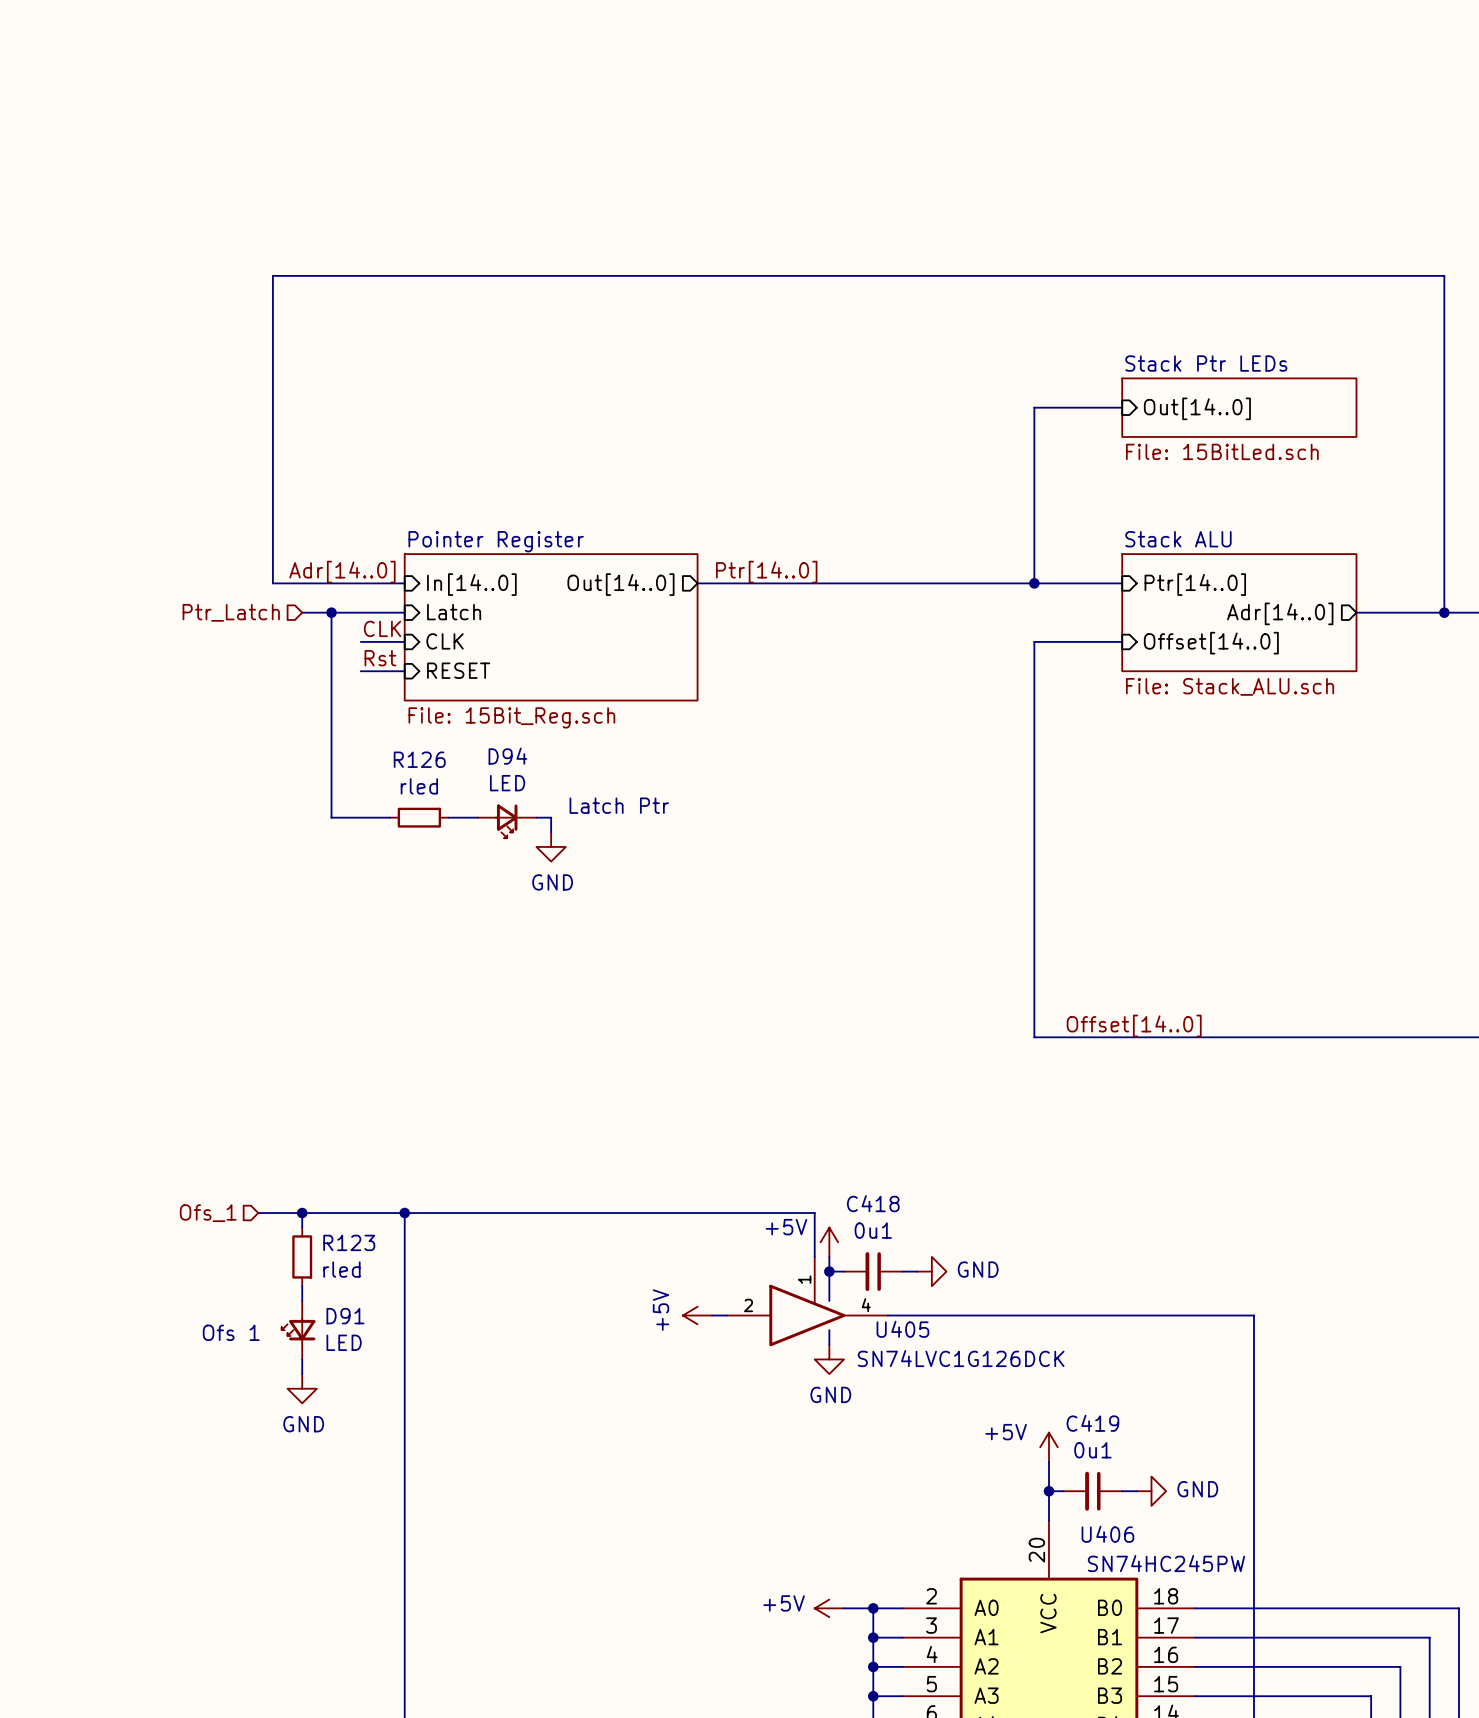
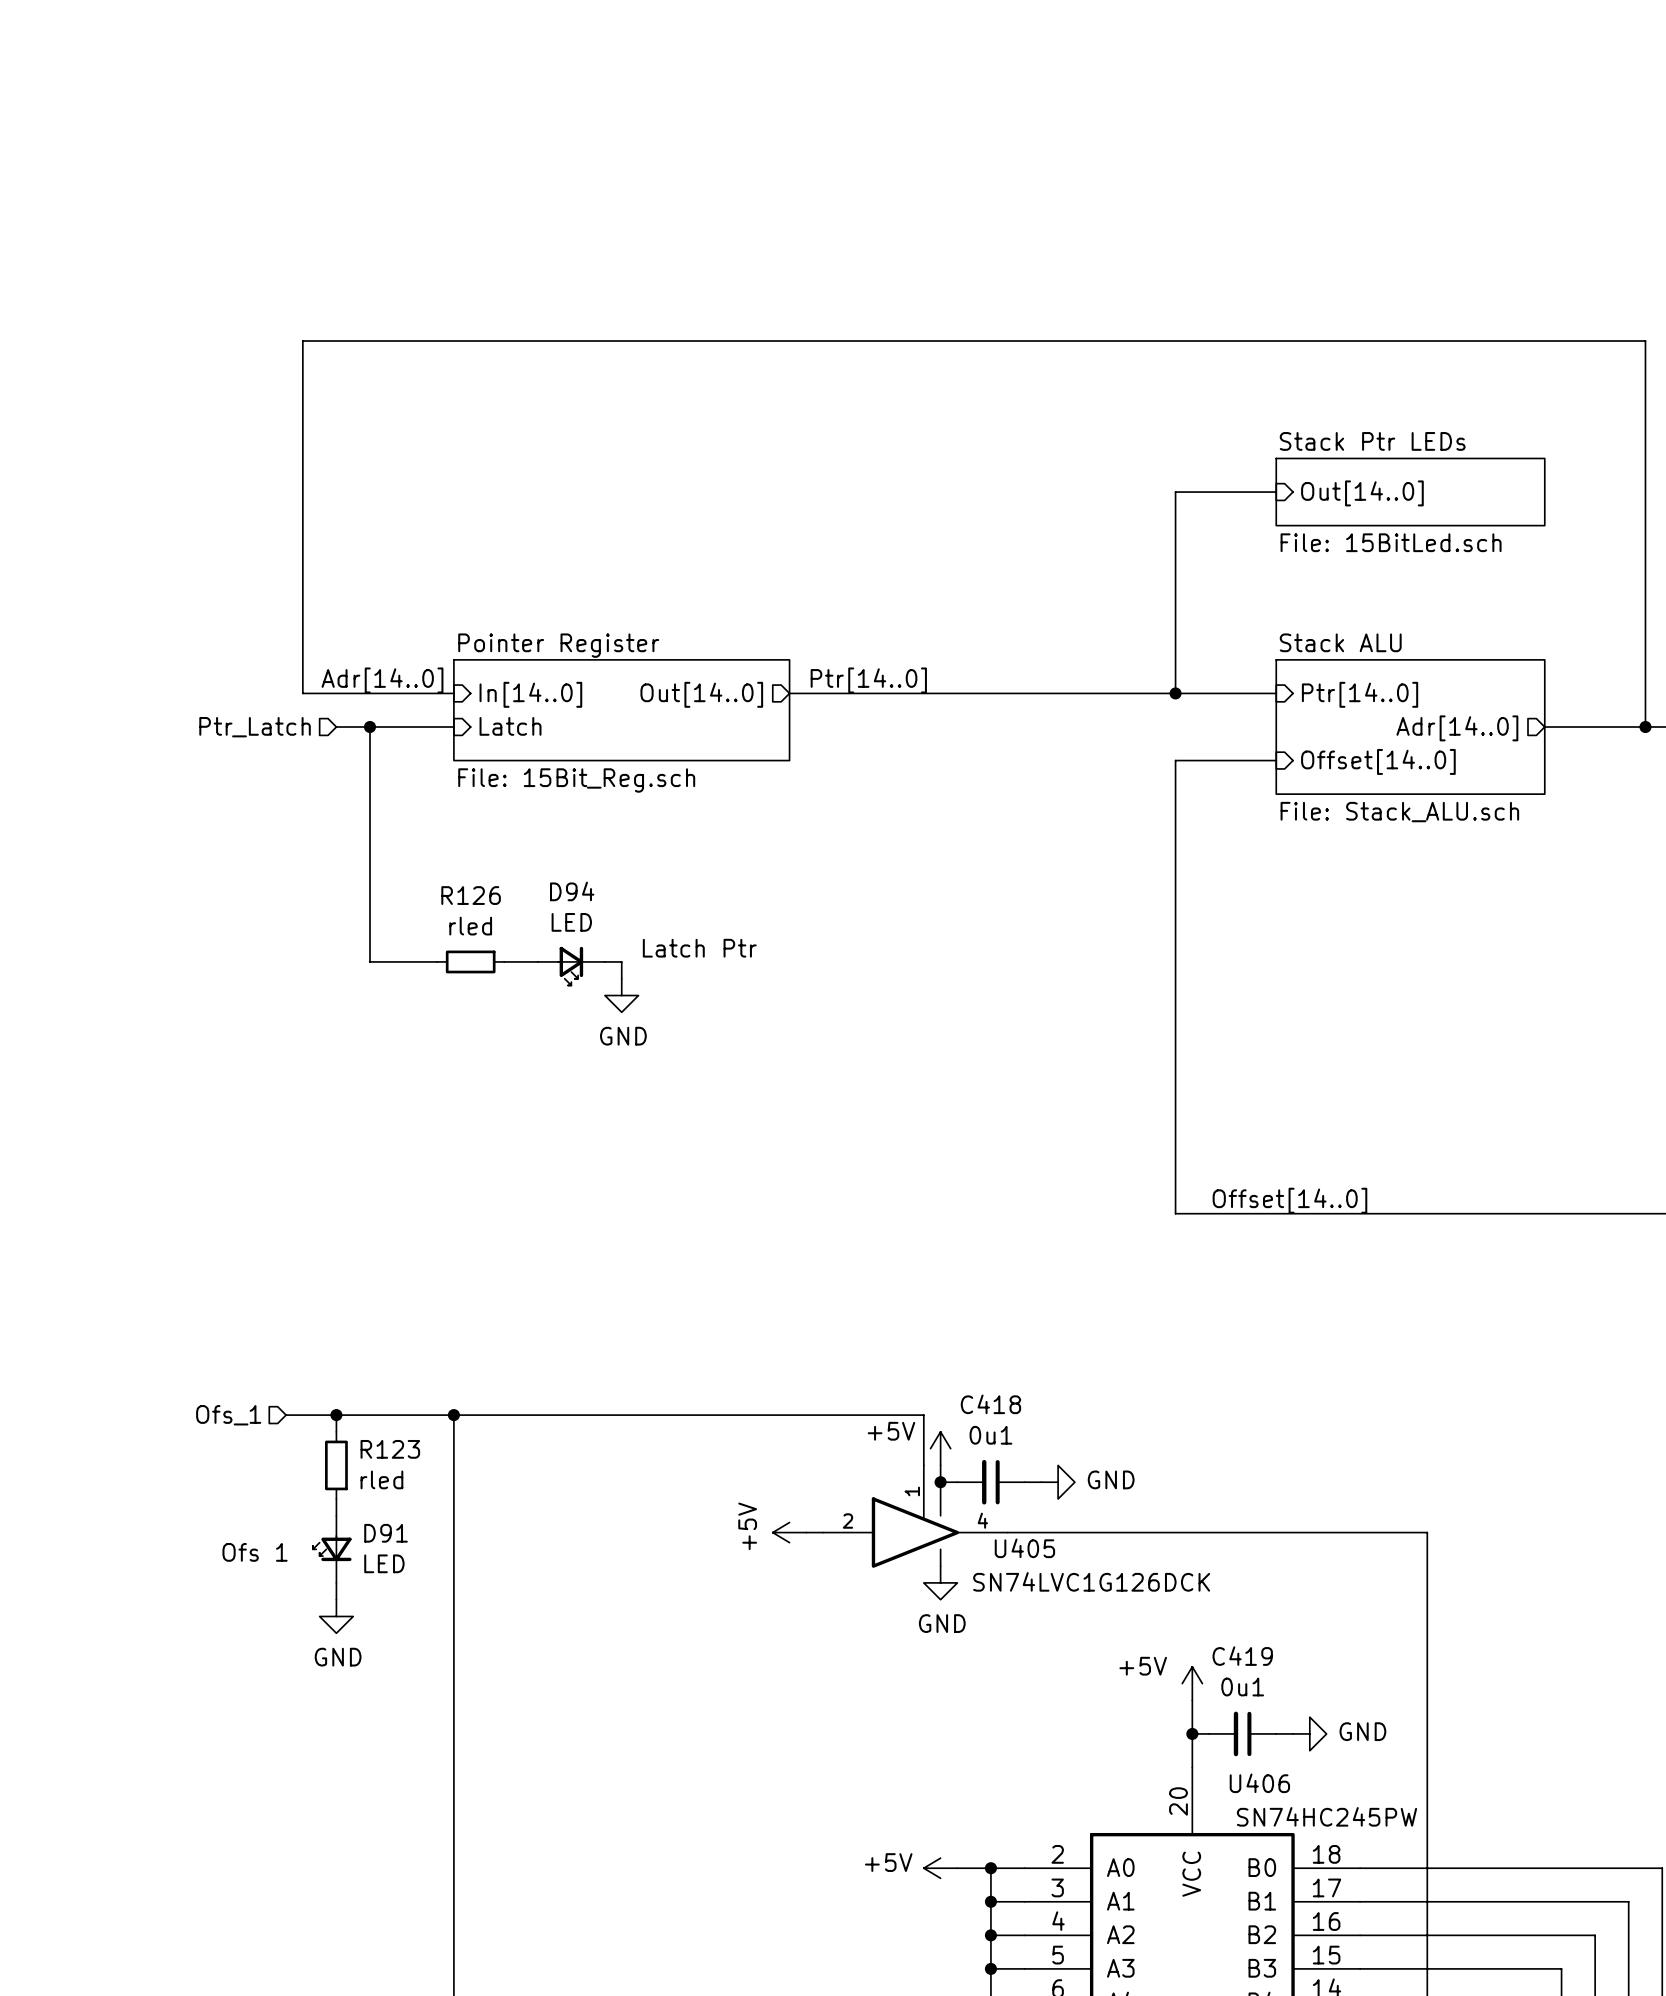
sheet Pointer Register: none -> File: 15Bit_Reg.sch (621, 710)
sheet Pointer Register: File: 15Bit_Reg.sch (551, 627) -> none
label: CLK (382, 628) -> none
wire: (360, 641) (404, 641) -> none
sheet pin: CLK (445, 641) -> none
label: Rst (380, 658) -> none
sheet pin: RESET (458, 670) -> none
wire: (360, 671) (404, 671) -> none

